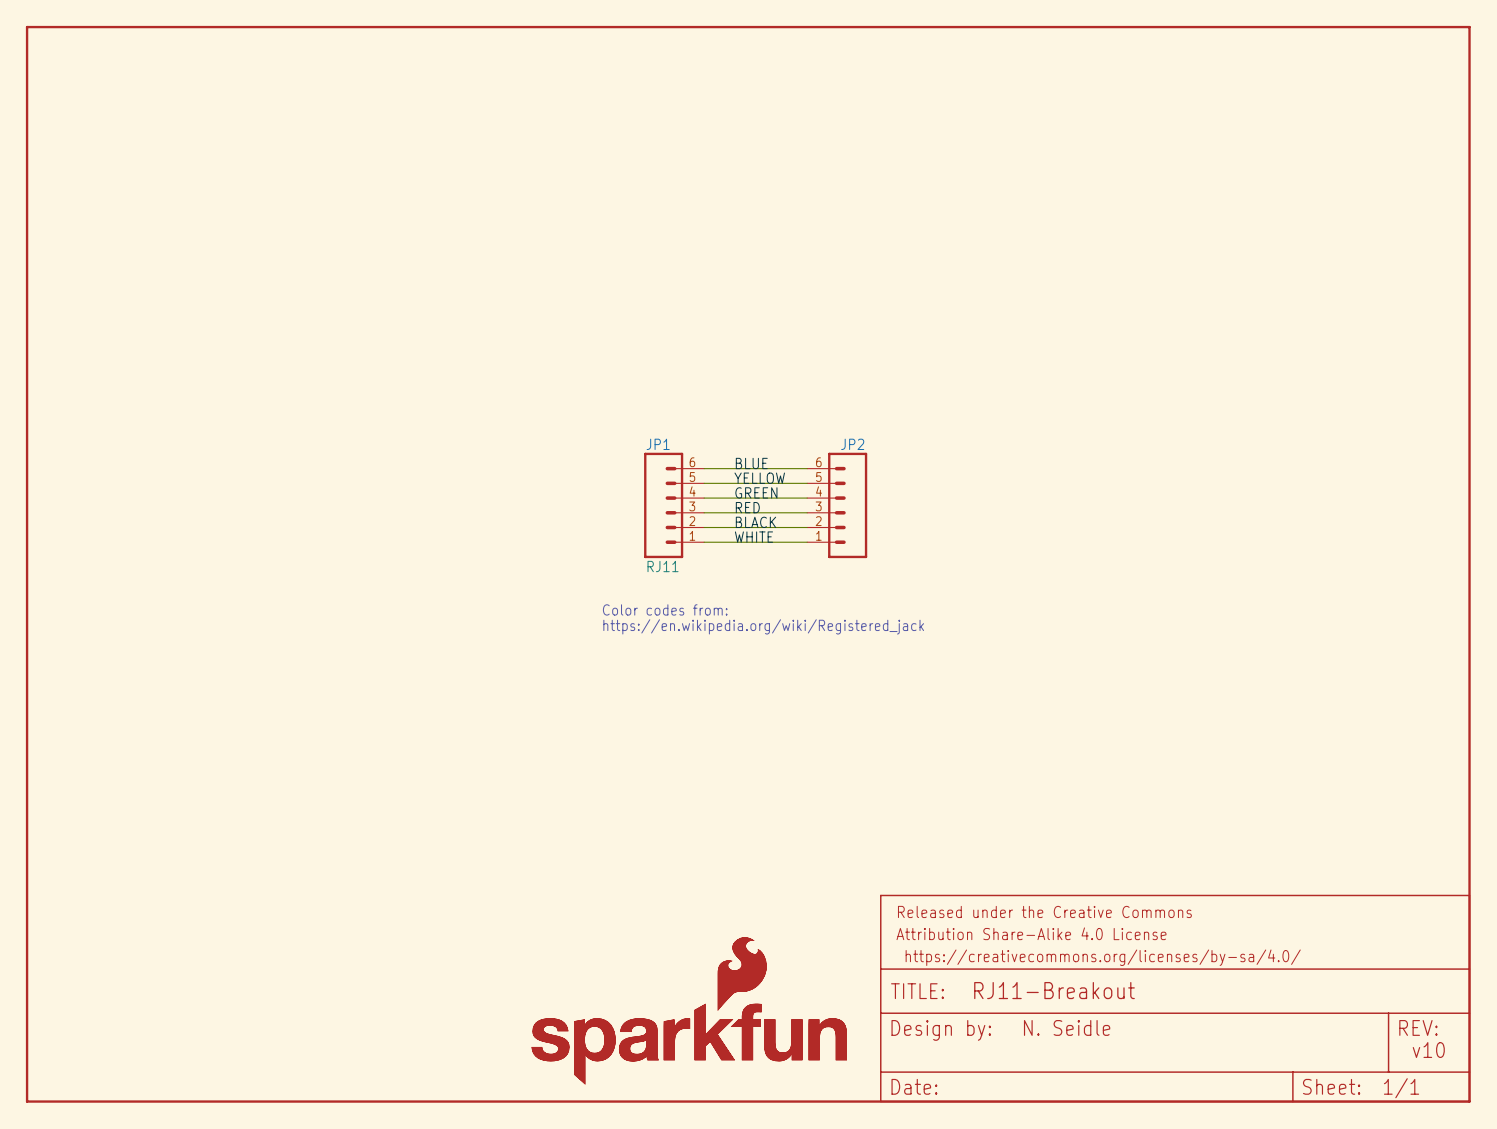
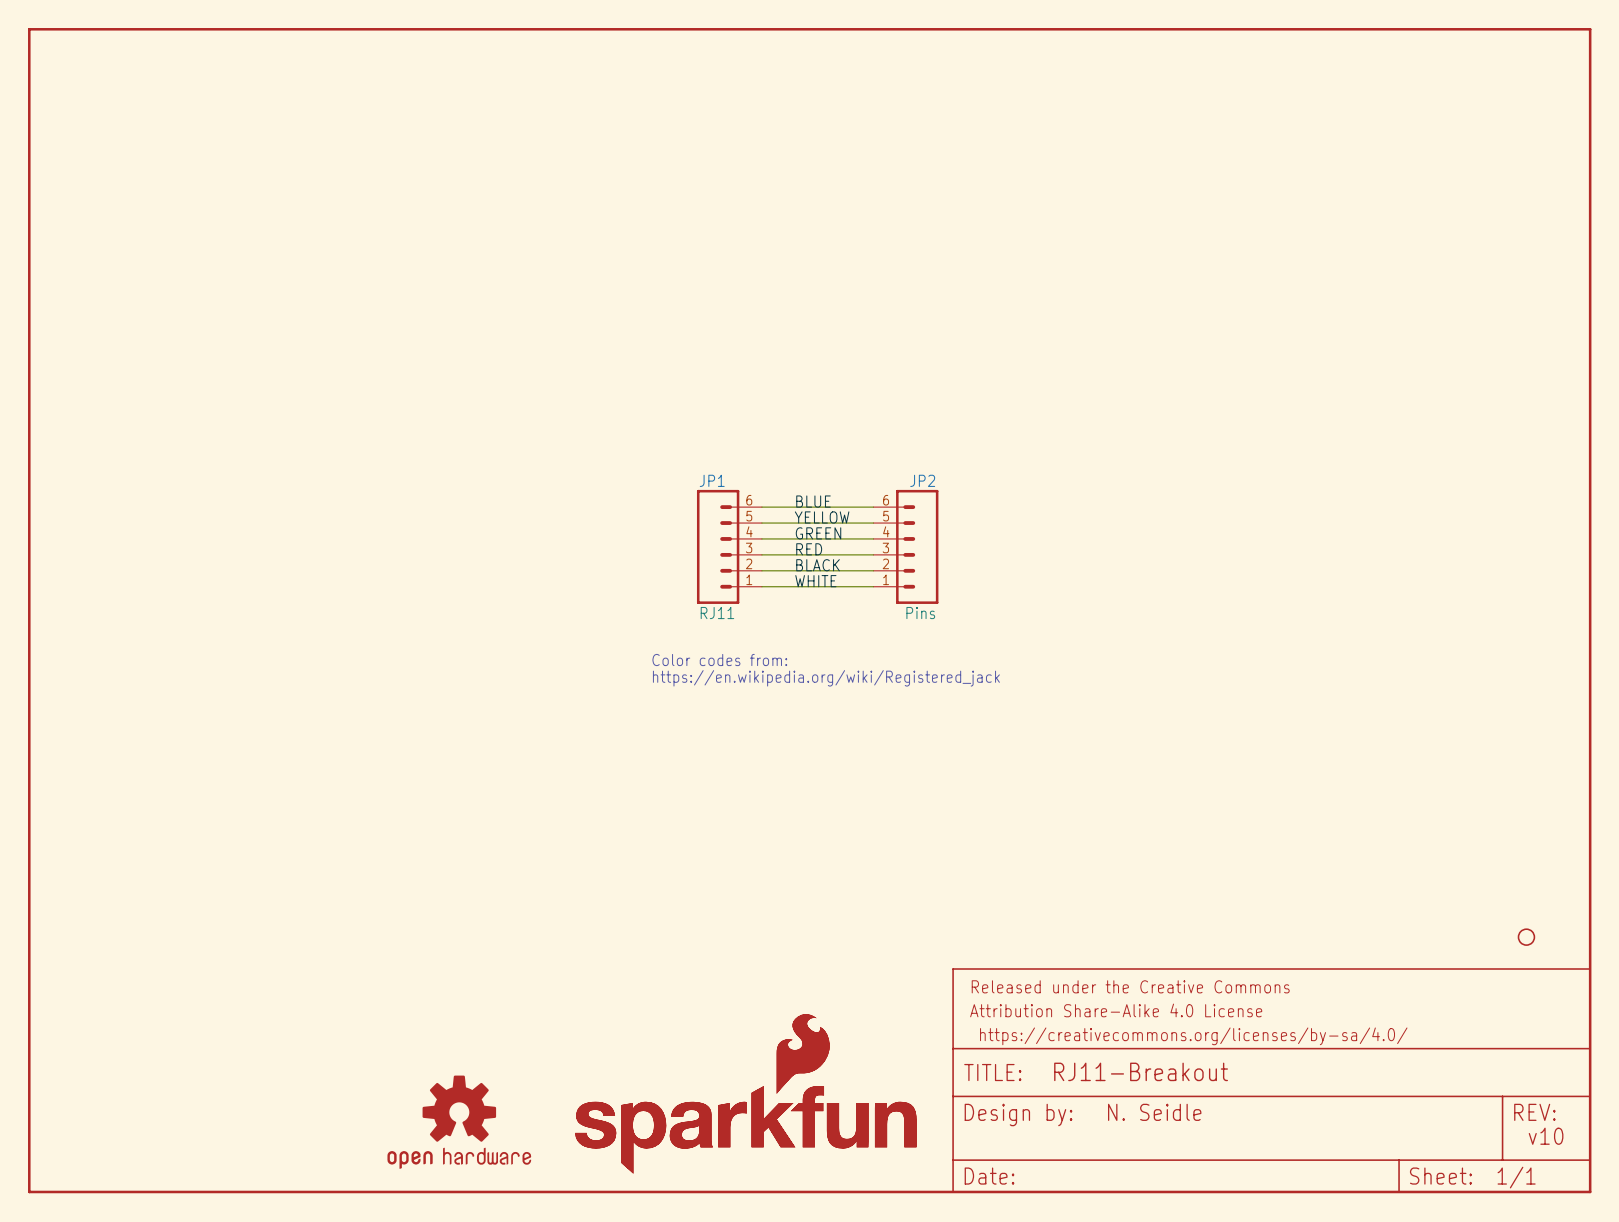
JP2 value: none -> Pins (920, 613)
part: none -> (1526, 937)
part: none -> (459, 1122)

